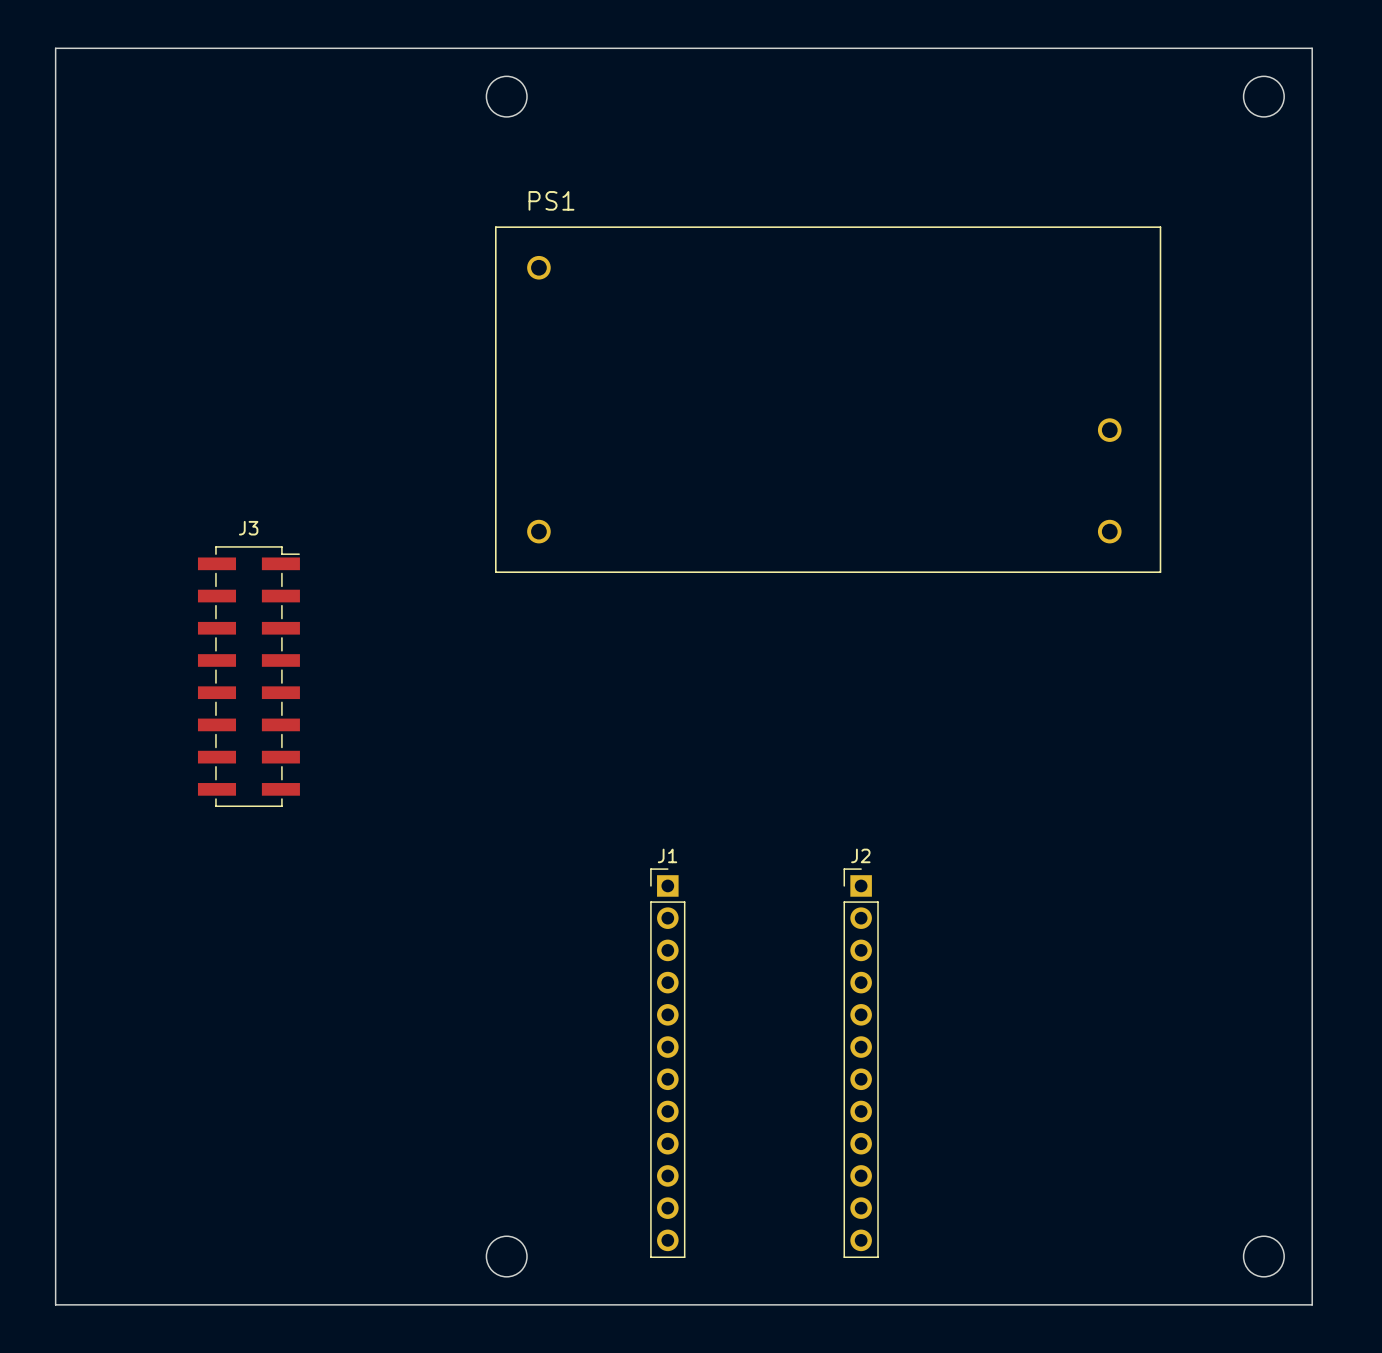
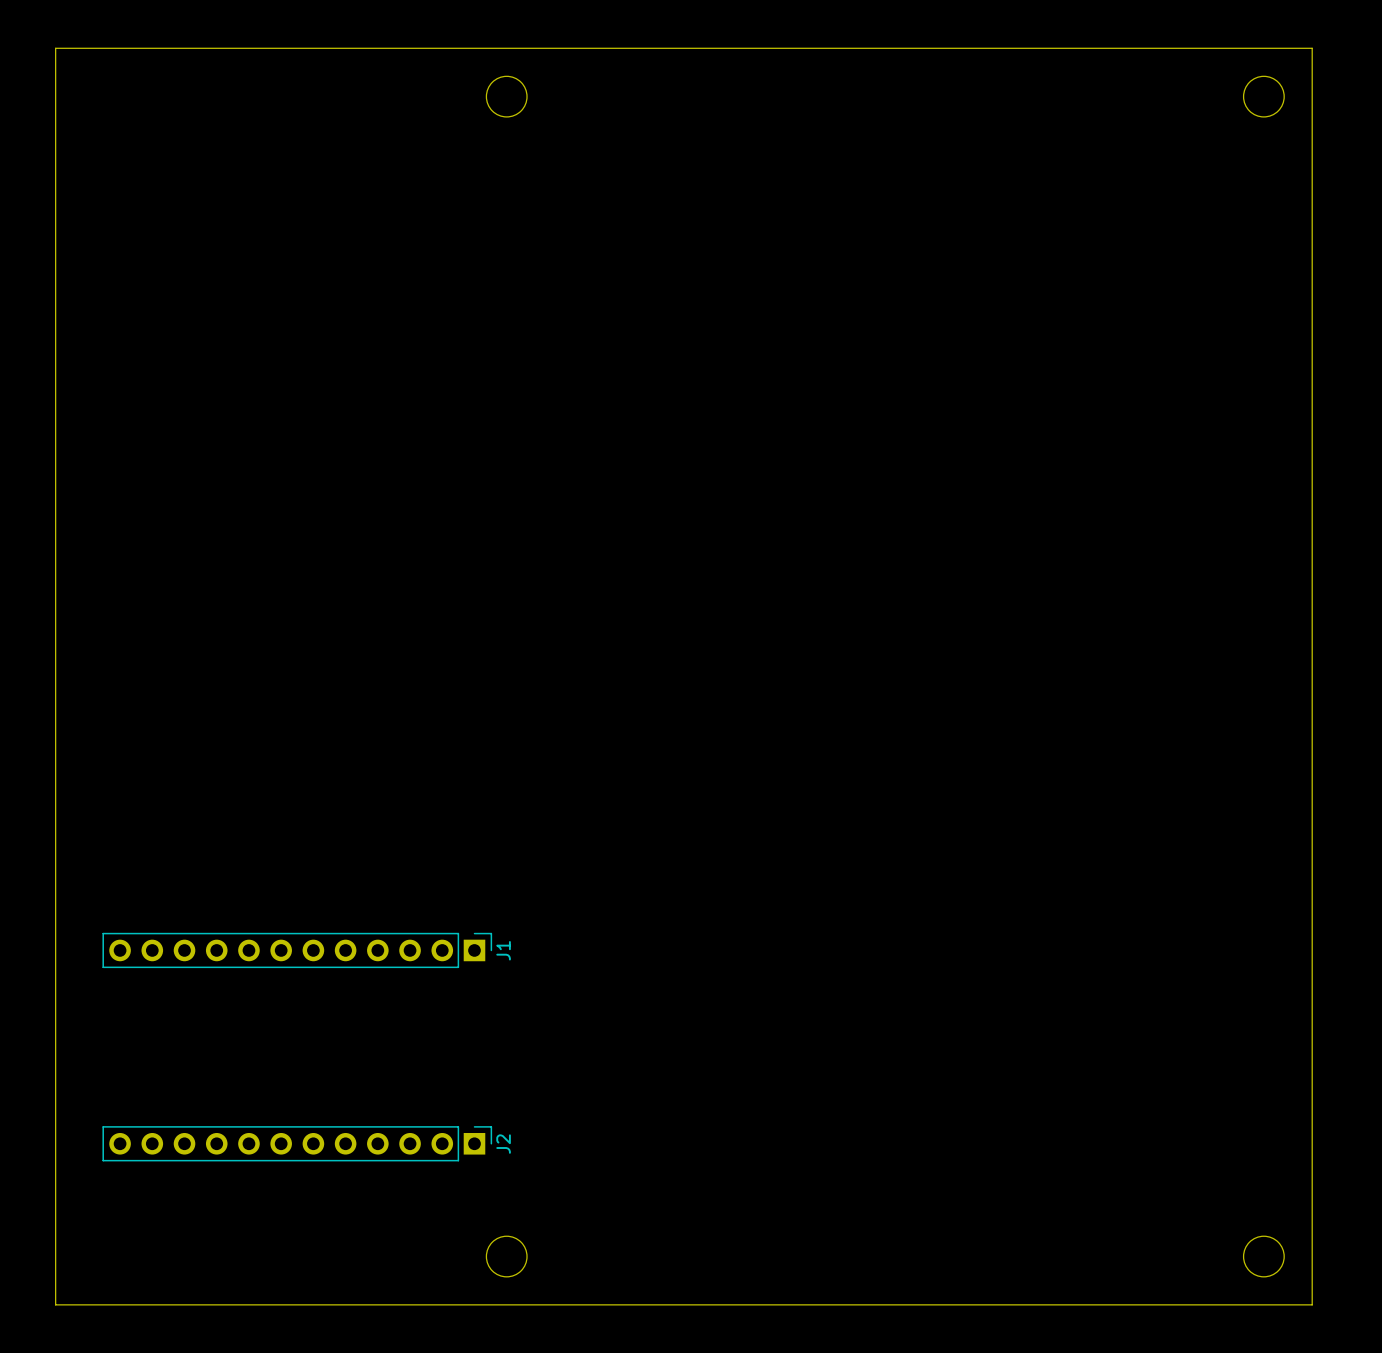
PS1: (828, 399) -> none
J3: (248, 676) -> none
J1 rotation: 0° (667, 1063) -> 90° clockwise (297, 950)
J1 position: (667, 1063) -> (297, 950)
J2 rotation: 0° (861, 1063) -> 90° clockwise (297, 1143)
J2 position: (861, 1063) -> (297, 1143)

